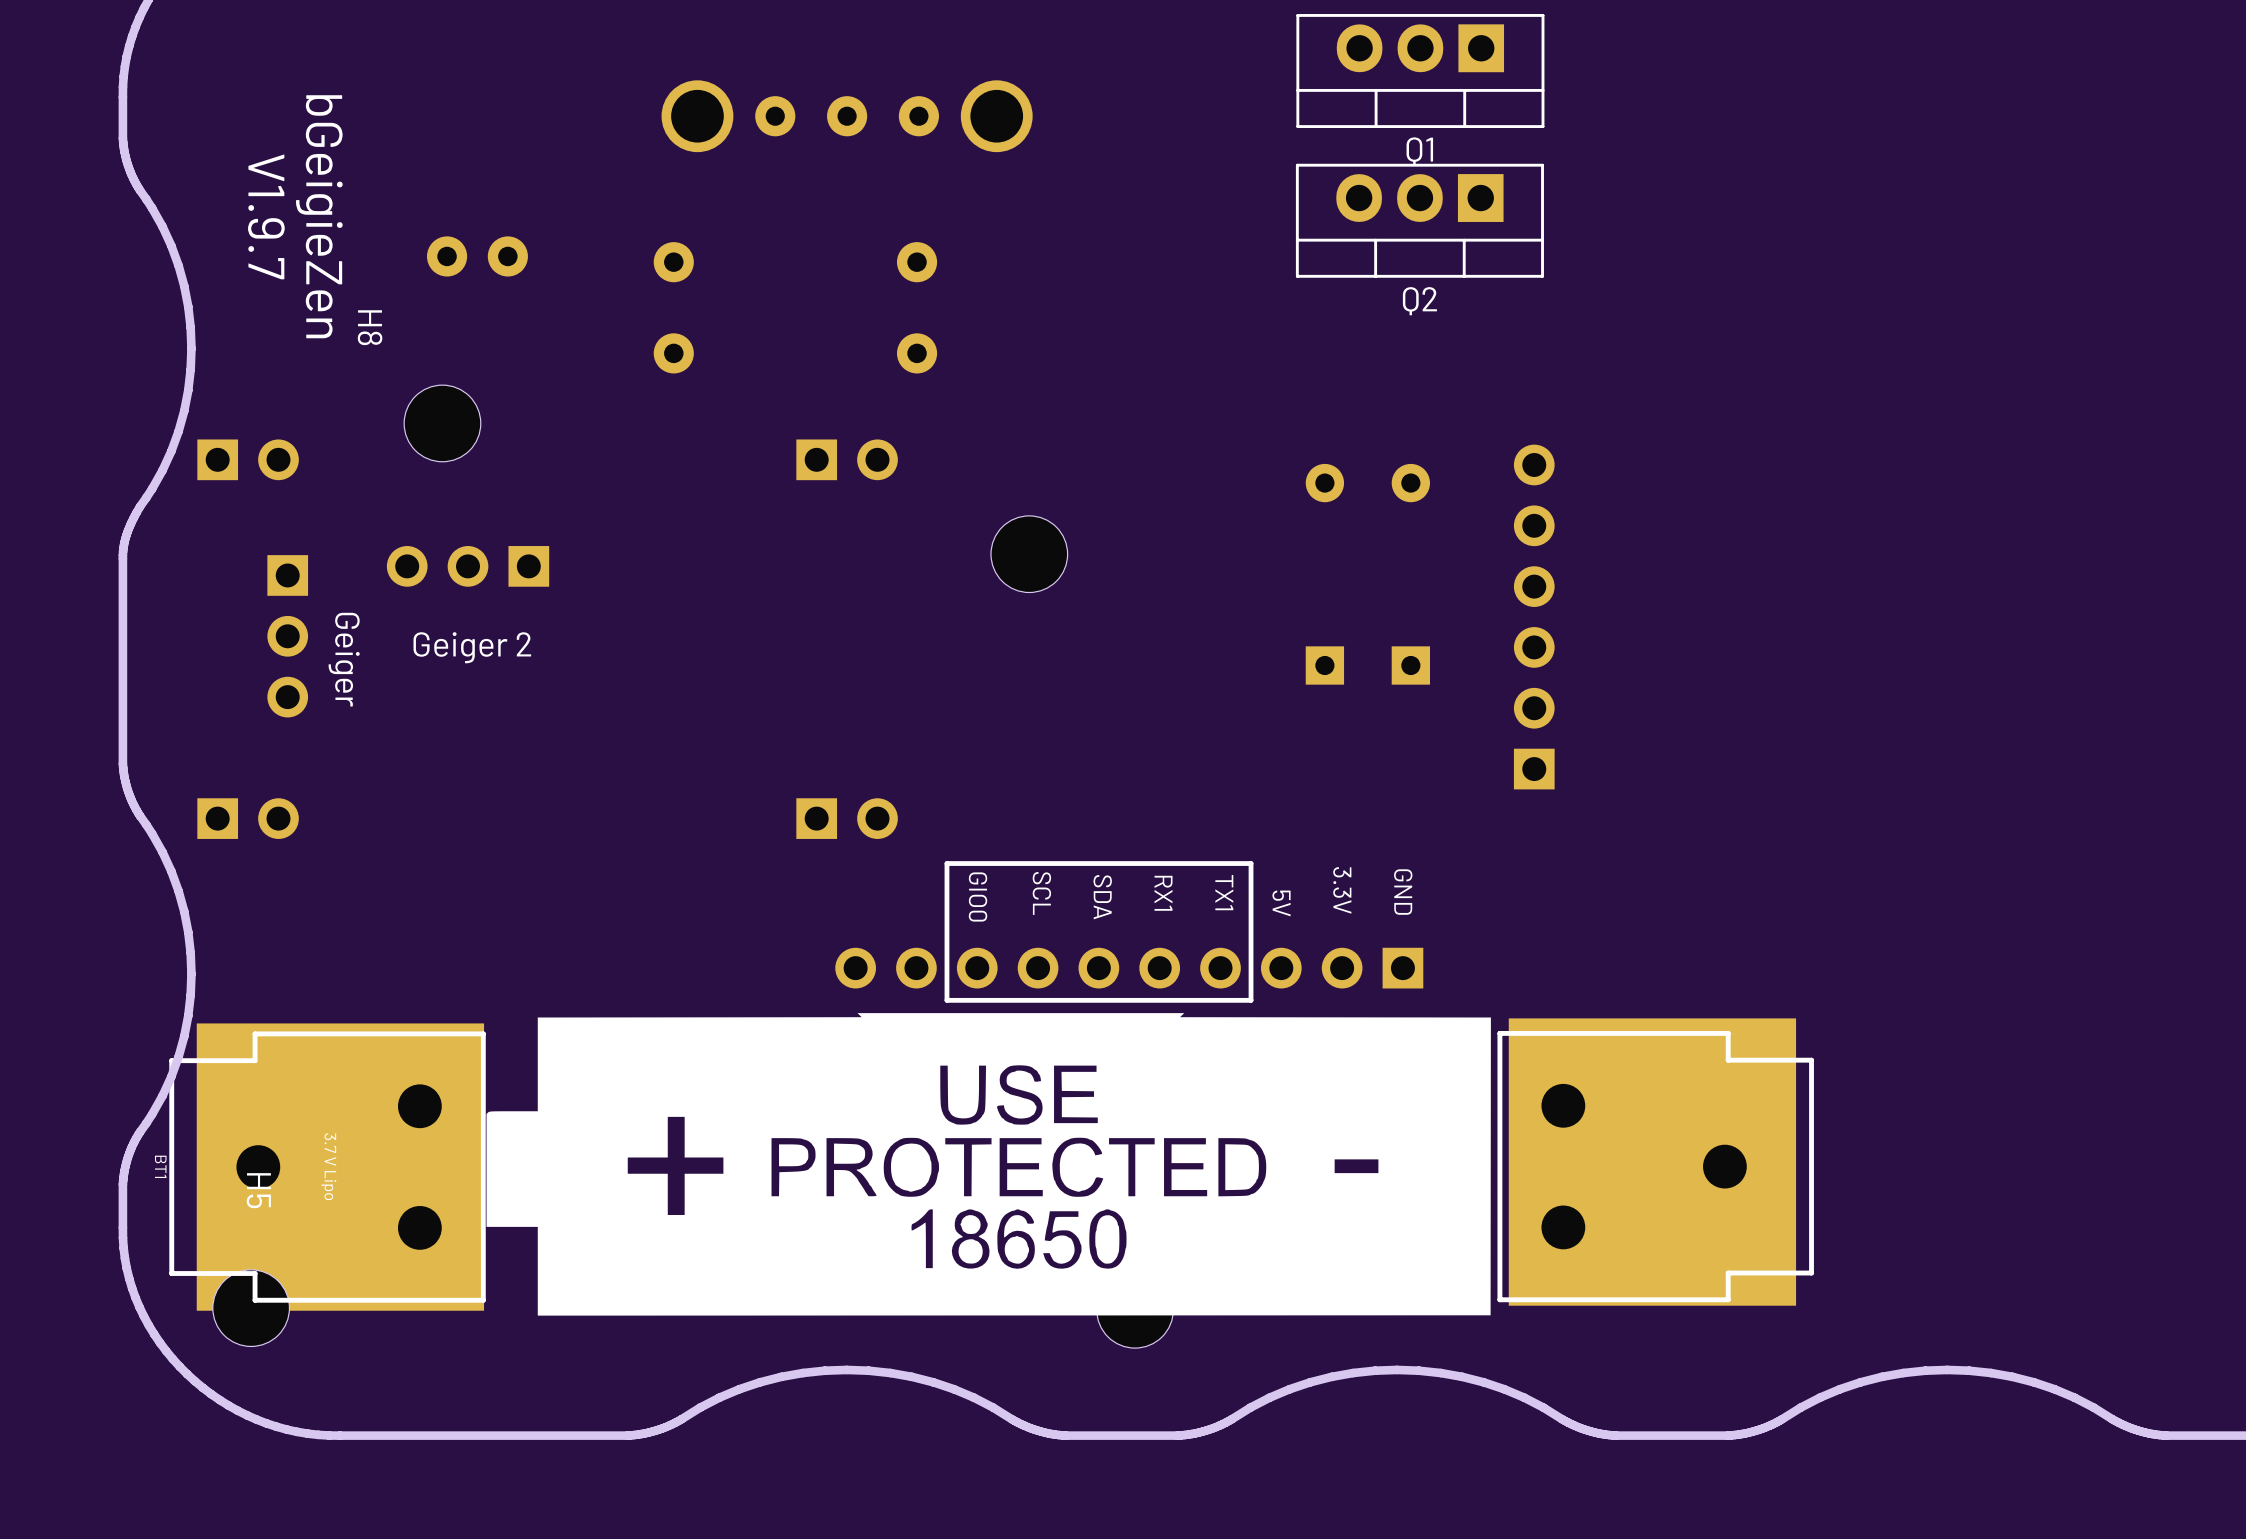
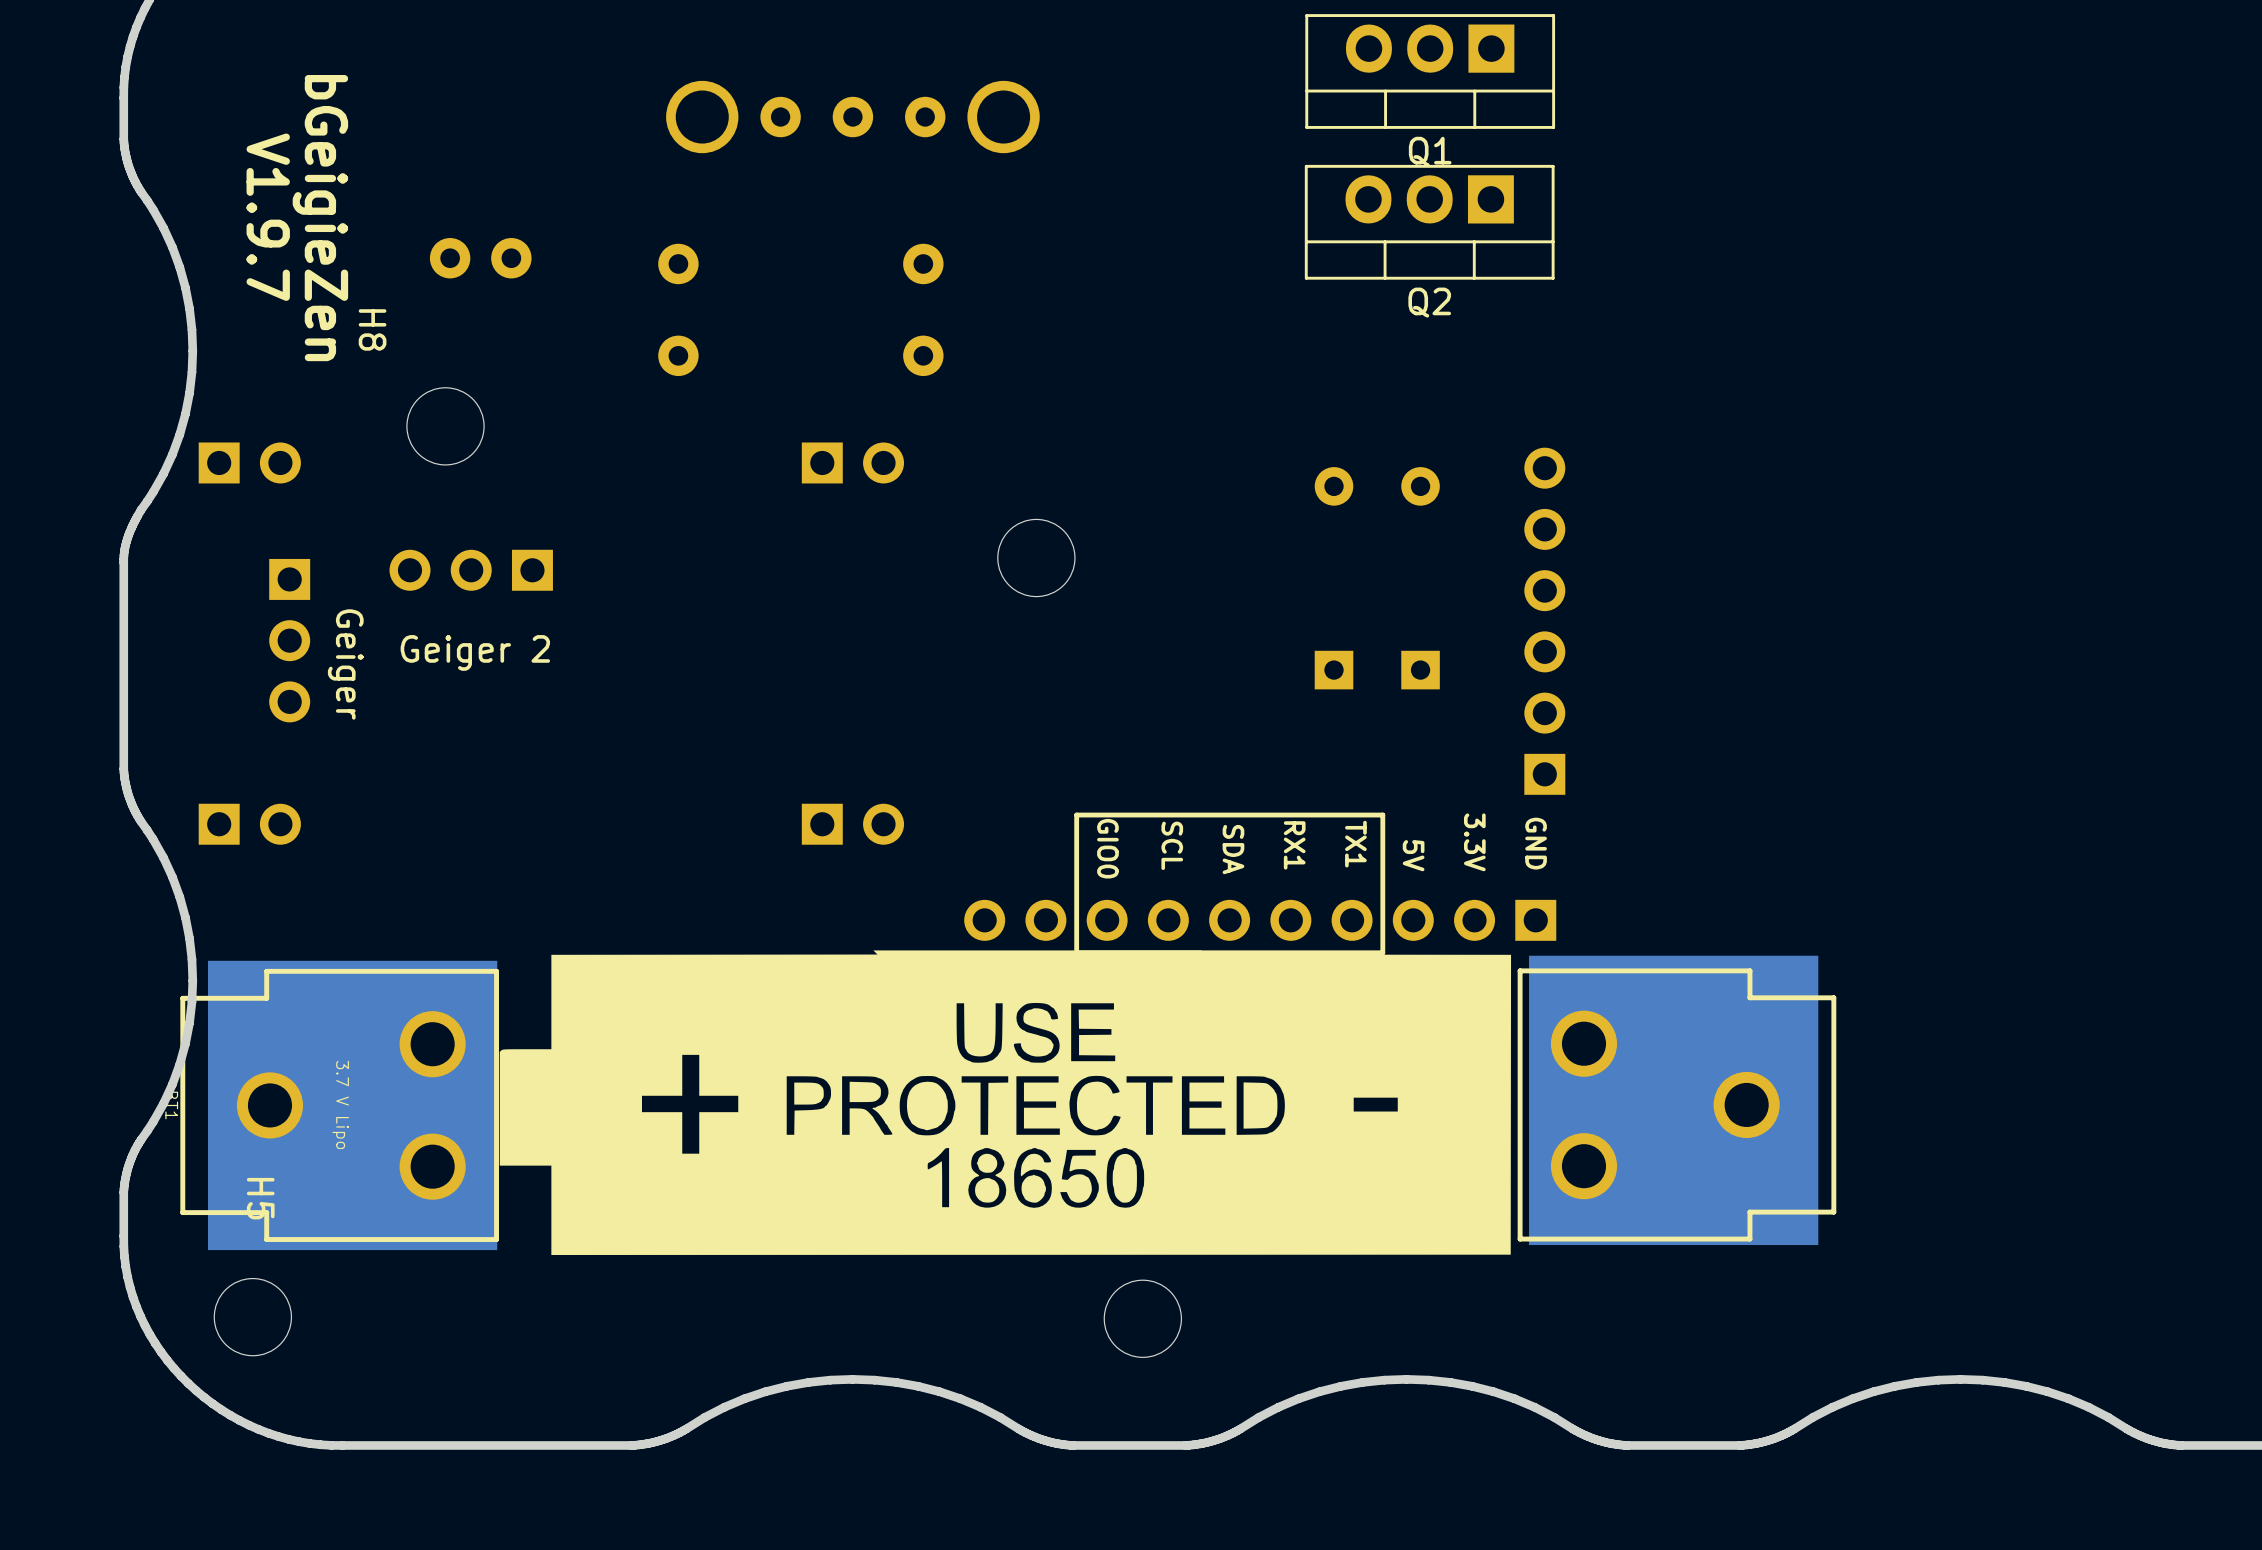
line: (1251, 863) (1251, 1000) (946, 1000) (946, 863) (1251, 863) -> (1382, 815) (1382, 952) (1076, 952) (1076, 815) (1382, 815)
text position: 3.3V (1342, 890) -> 3.3V (1474, 842)
text position: TX1 (1224, 892) -> TX1 (1355, 844)
text position: GND (1403, 892) -> GND (1536, 843)
text position: SCL (1041, 893) -> SCL (1172, 845)
text position: RX1 (1163, 893) -> RX1 (1294, 845)
text position: GIO0 (978, 896) -> GIO0 (1107, 848)
text position: SDA (1102, 897) -> SDA (1233, 849)
text position: 5V (1281, 903) -> 5V (1413, 855)
part position: (1129, 968) -> (1260, 920)
drawing position: (988, 1164) -> (1005, 1102)
BT1 position: (991, 1164) -> (1008, 1102)

